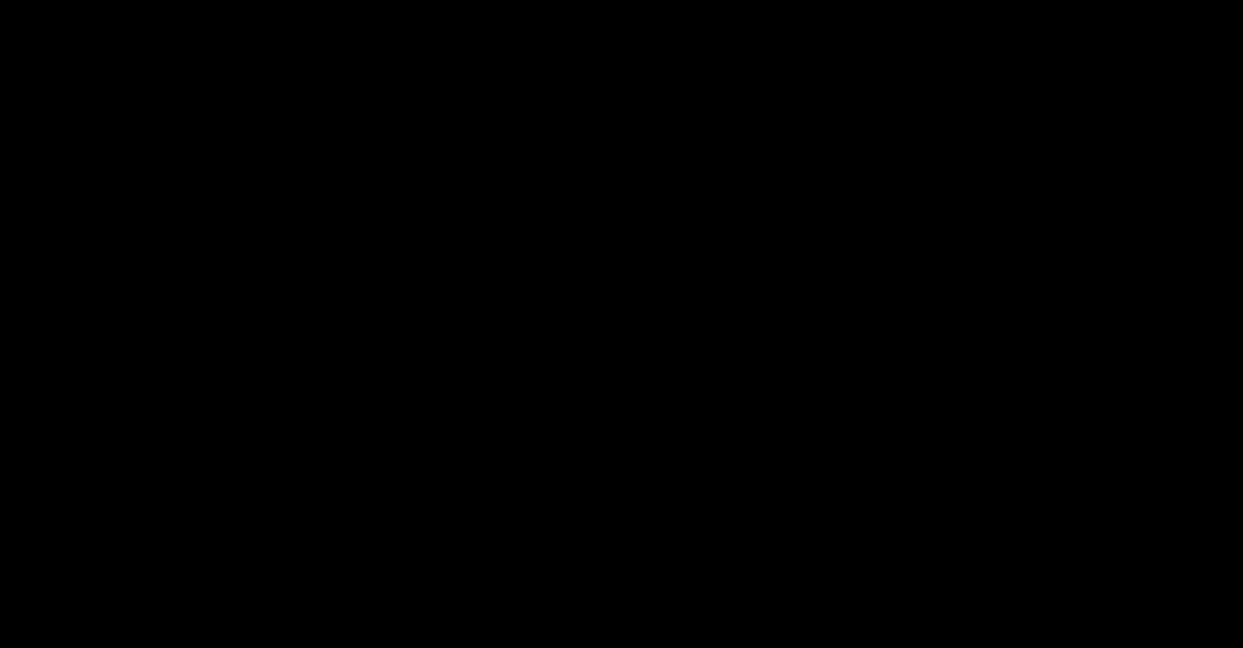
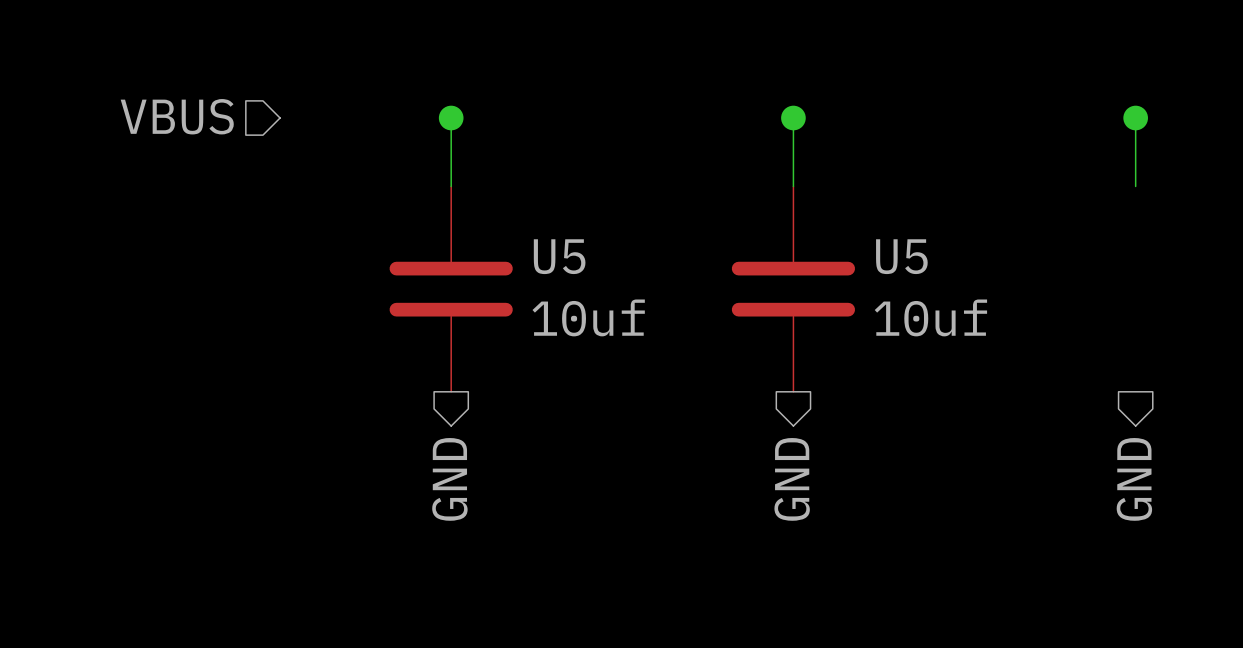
hierarchical label: none -> VBUS (177, 116)
wire: none -> (451, 118) (451, 186)
junction: none -> (451, 118)
wire: none -> (793, 118) (793, 186)
junction: none -> (793, 118)
wire: none -> (1135, 118) (1135, 186)
junction: none -> (1135, 118)
U5: none -> 10uf (451, 289)
U5: none -> 10uf (793, 289)
hierarchical label: none -> GND (449, 479)
hierarchical label: none -> GND (792, 479)
hierarchical label: none -> GND (1134, 479)

